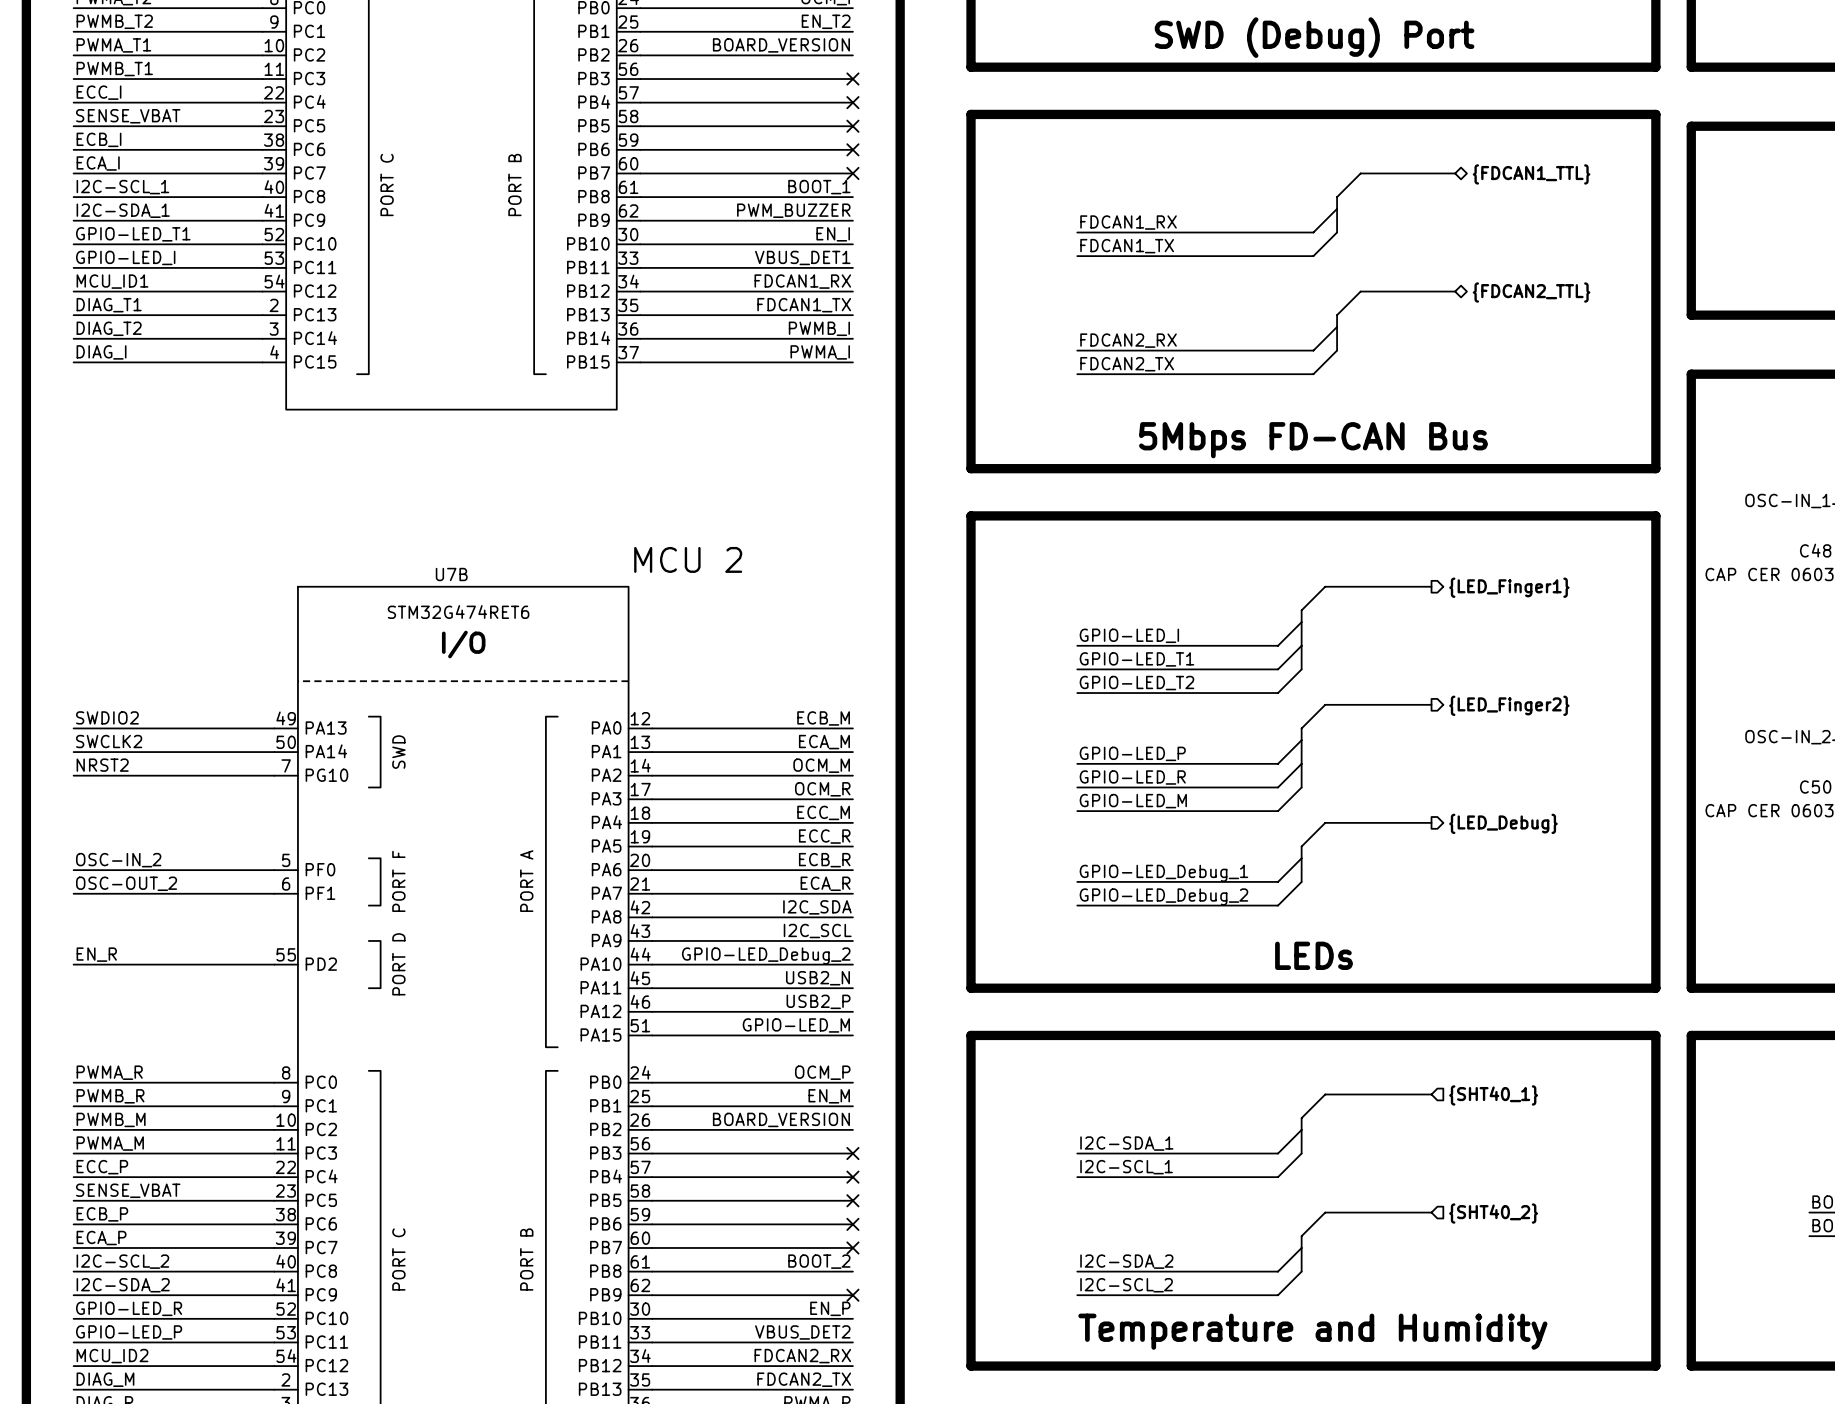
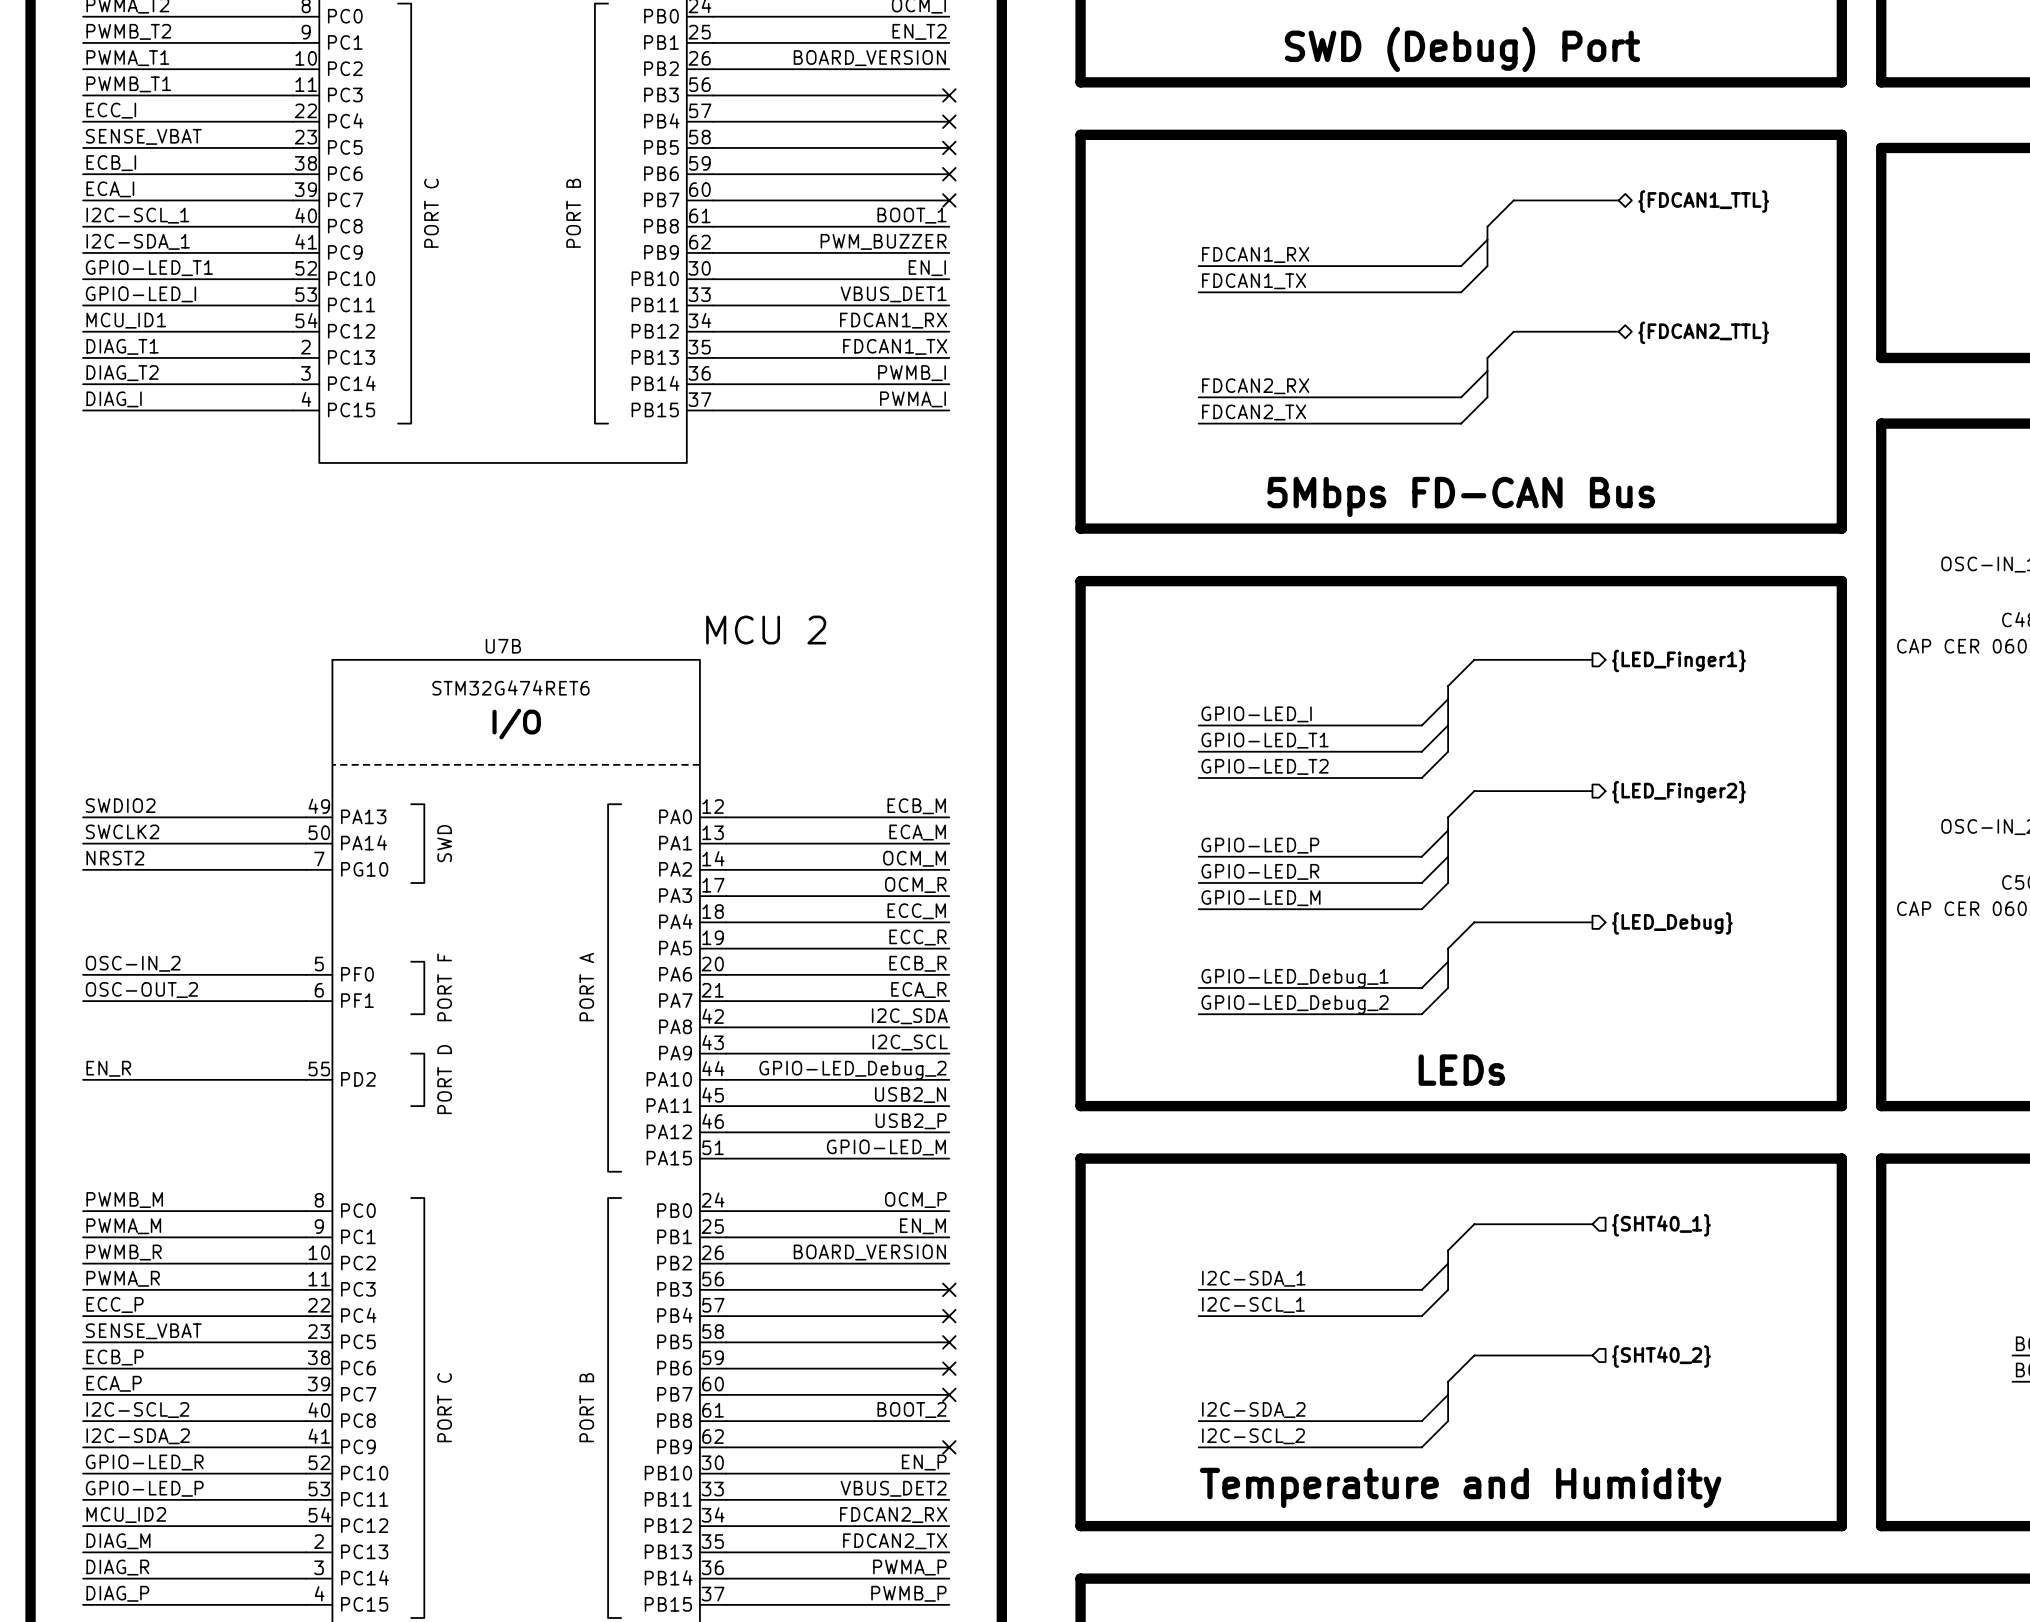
label: PWMA_R (109, 1072) -> PWMB_M (124, 1200)
label: PWMB_R (110, 1096) -> PWMA_M (123, 1226)
label: PWMB_M (111, 1119) -> PWMB_R (124, 1252)
label: PWMA_M (110, 1143) -> PWMA_R (123, 1278)

